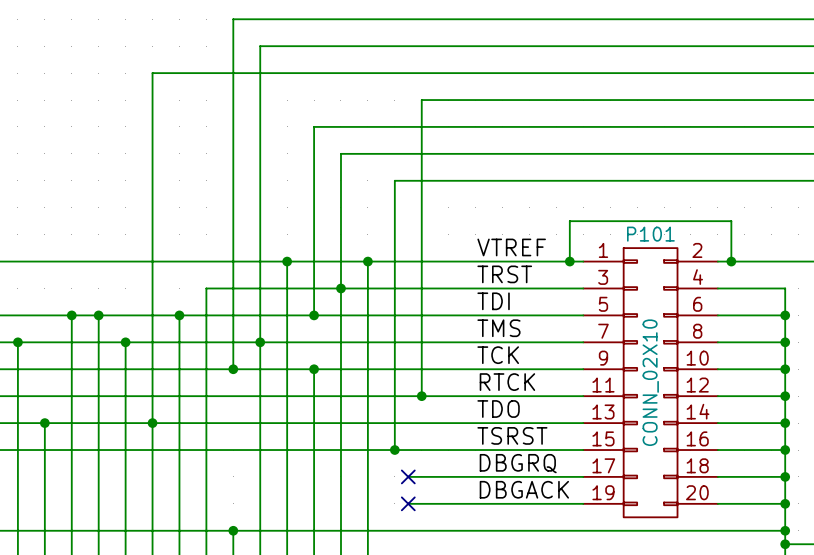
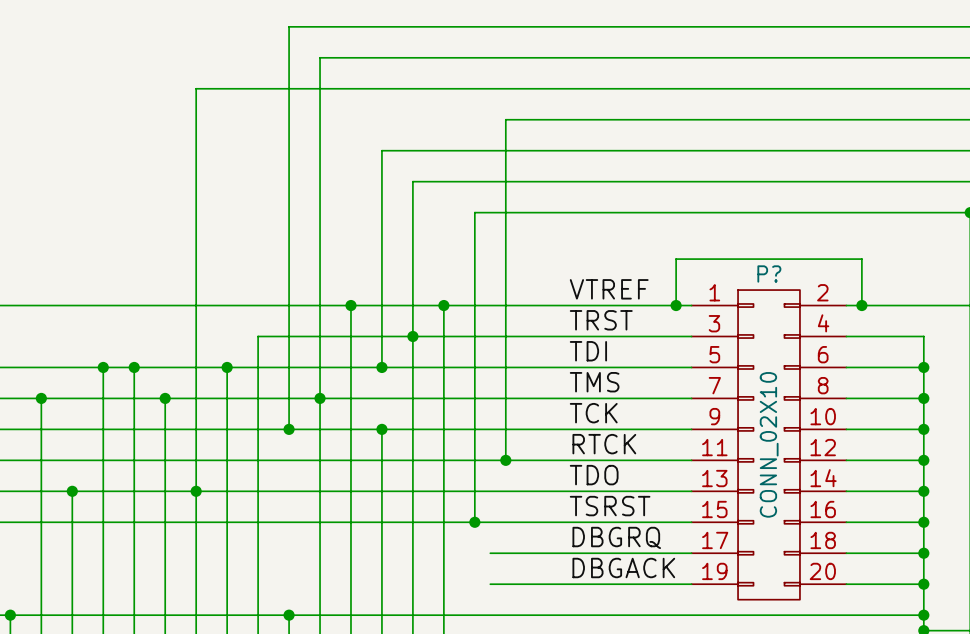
P101 name: P101 (650, 234) -> P? (769, 273)
no-connect mark: (408, 476) -> none
no-connect mark: (408, 503) -> none

